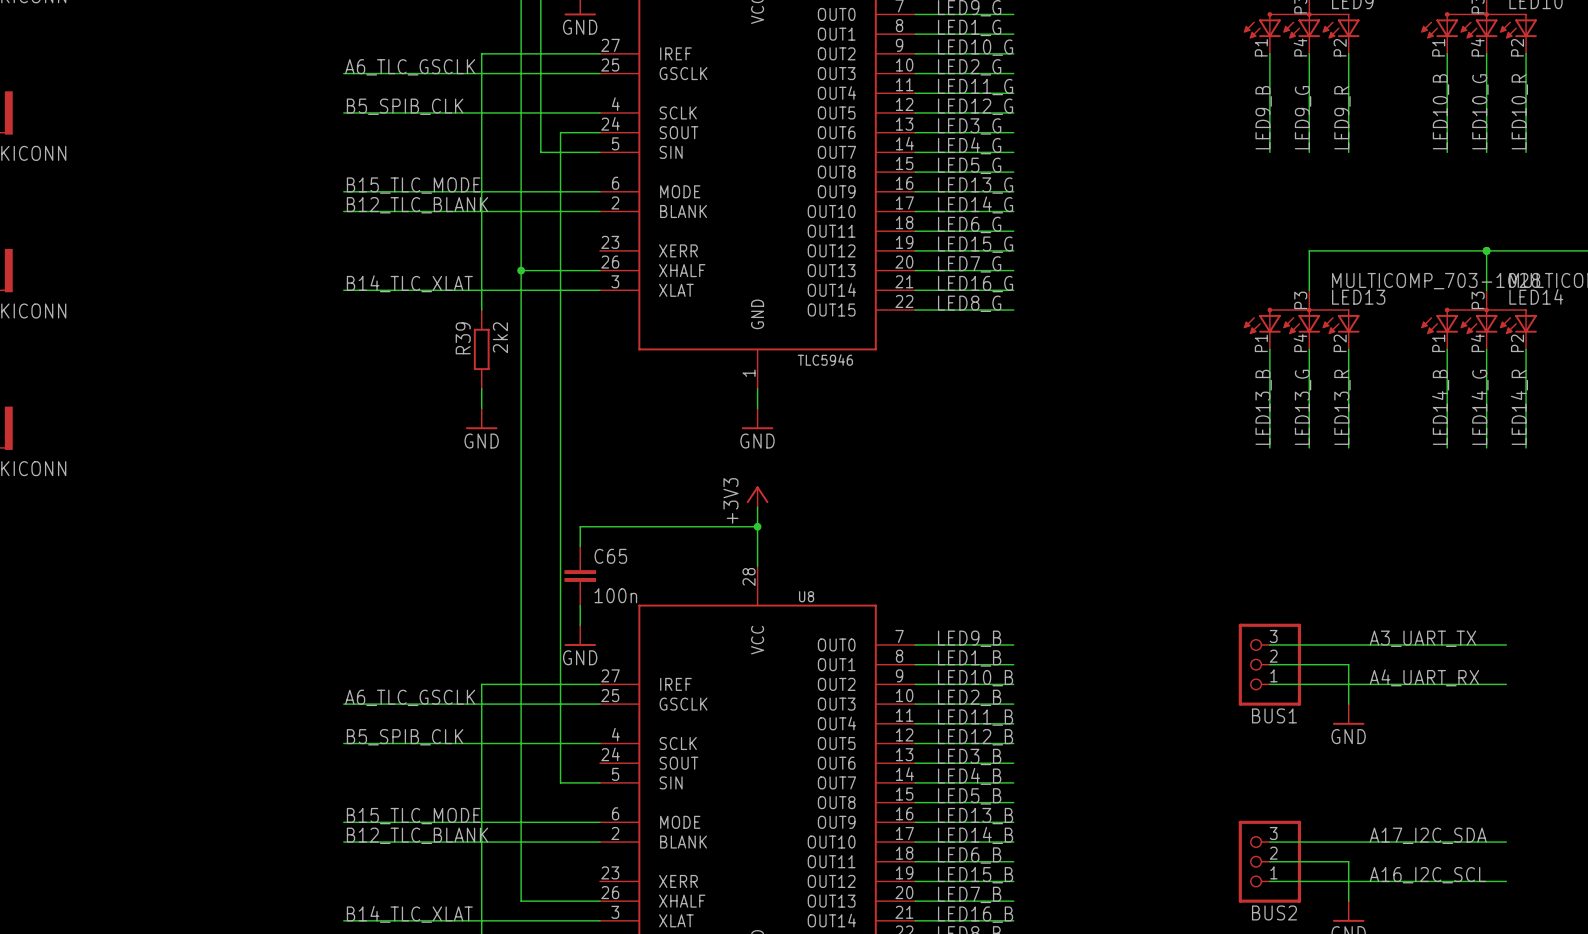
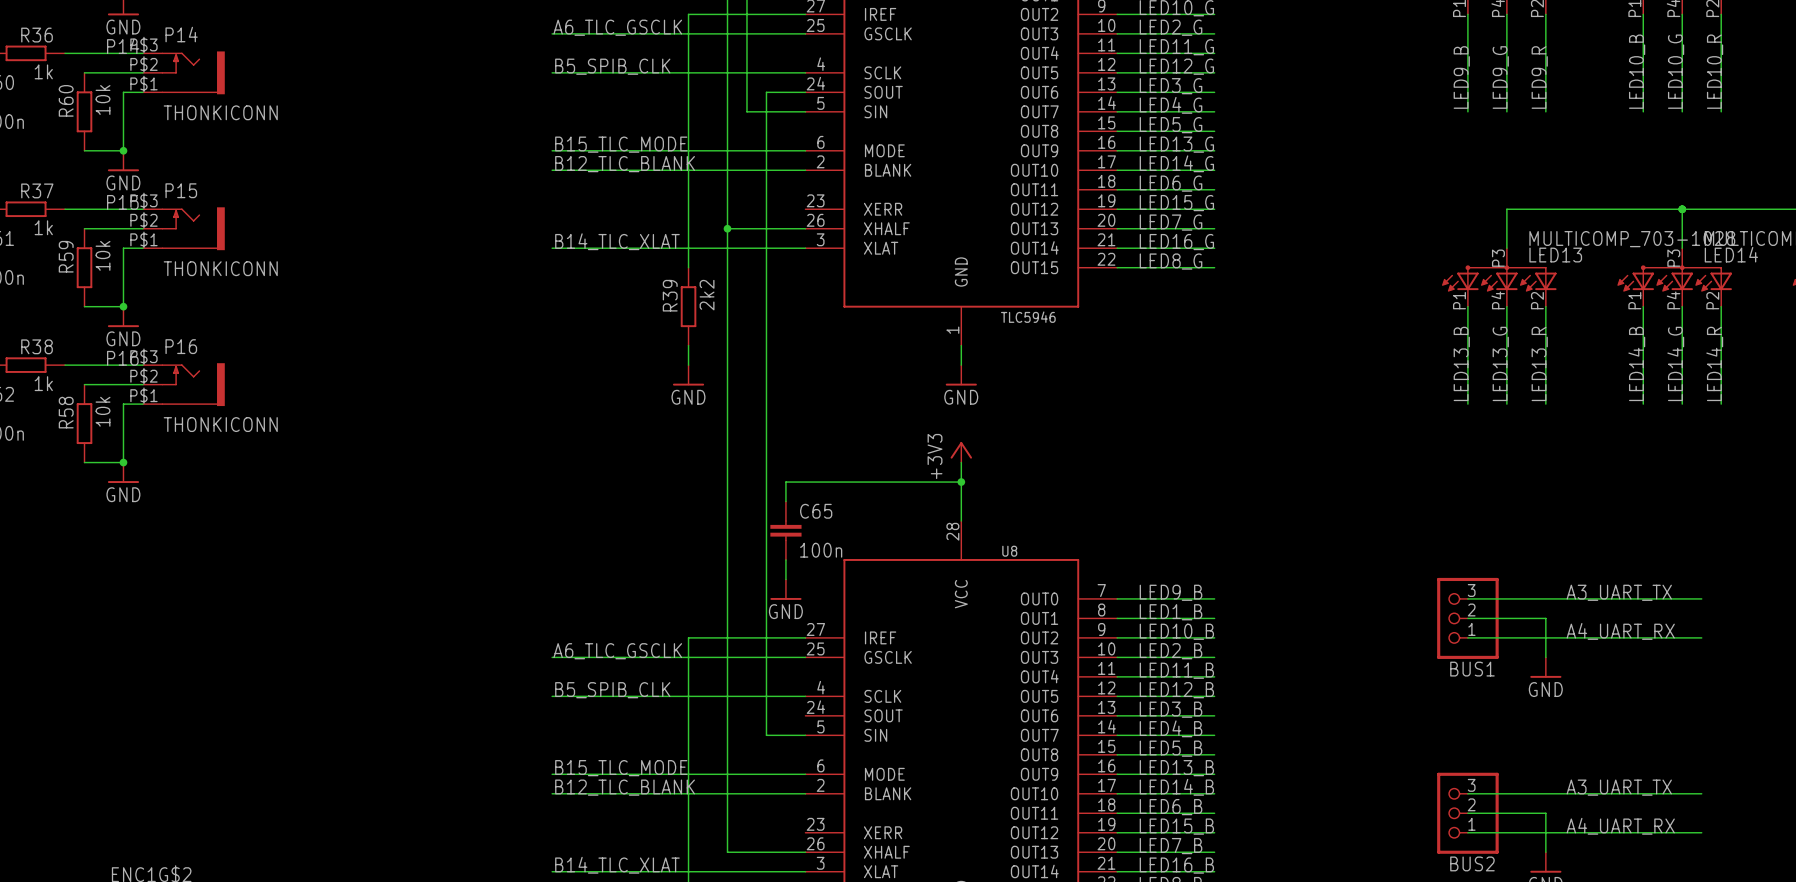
label: A17_I2C_SDA (1428, 835) -> A3_UART_TX (1619, 787)
label: A16_I2C_SCL (1427, 875) -> A4_UART_RX (1620, 826)

